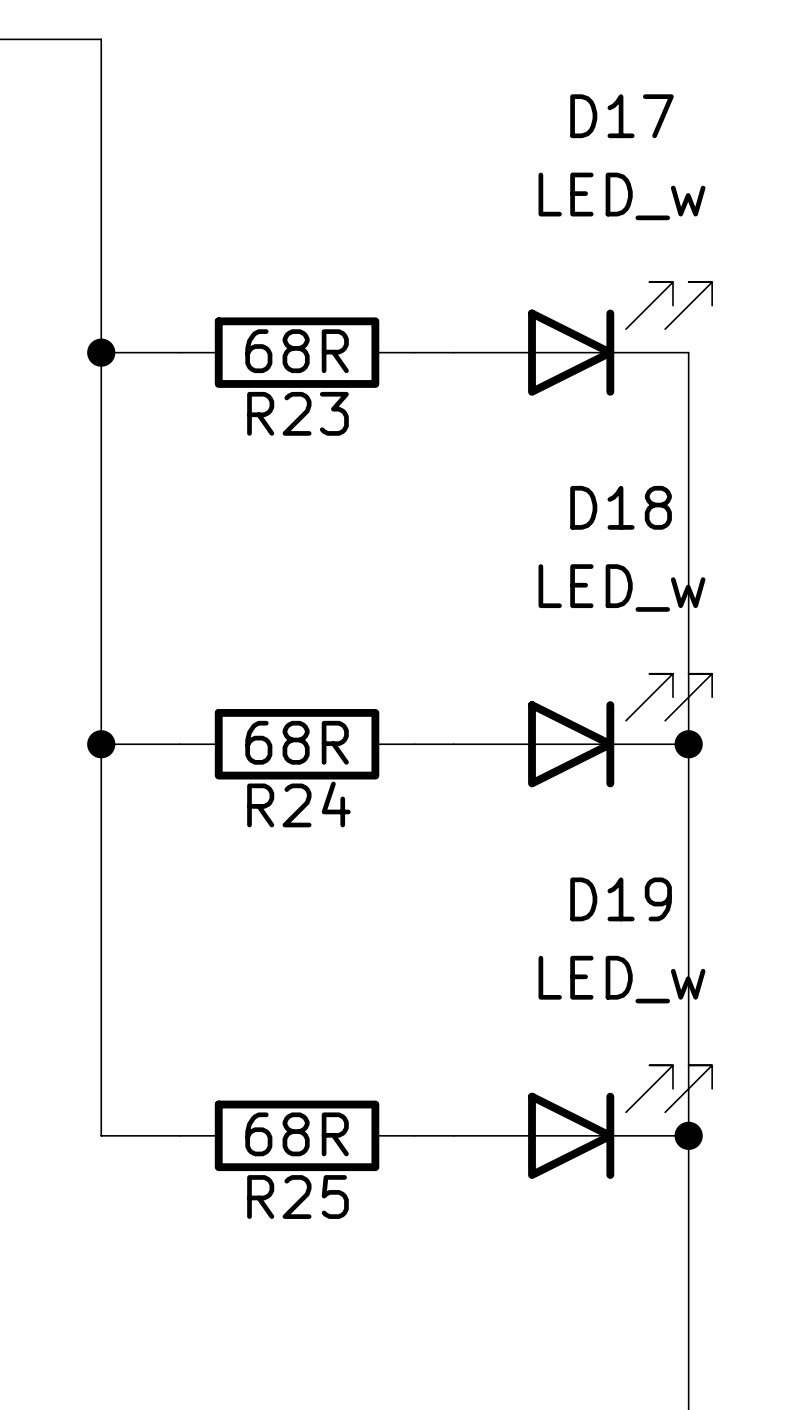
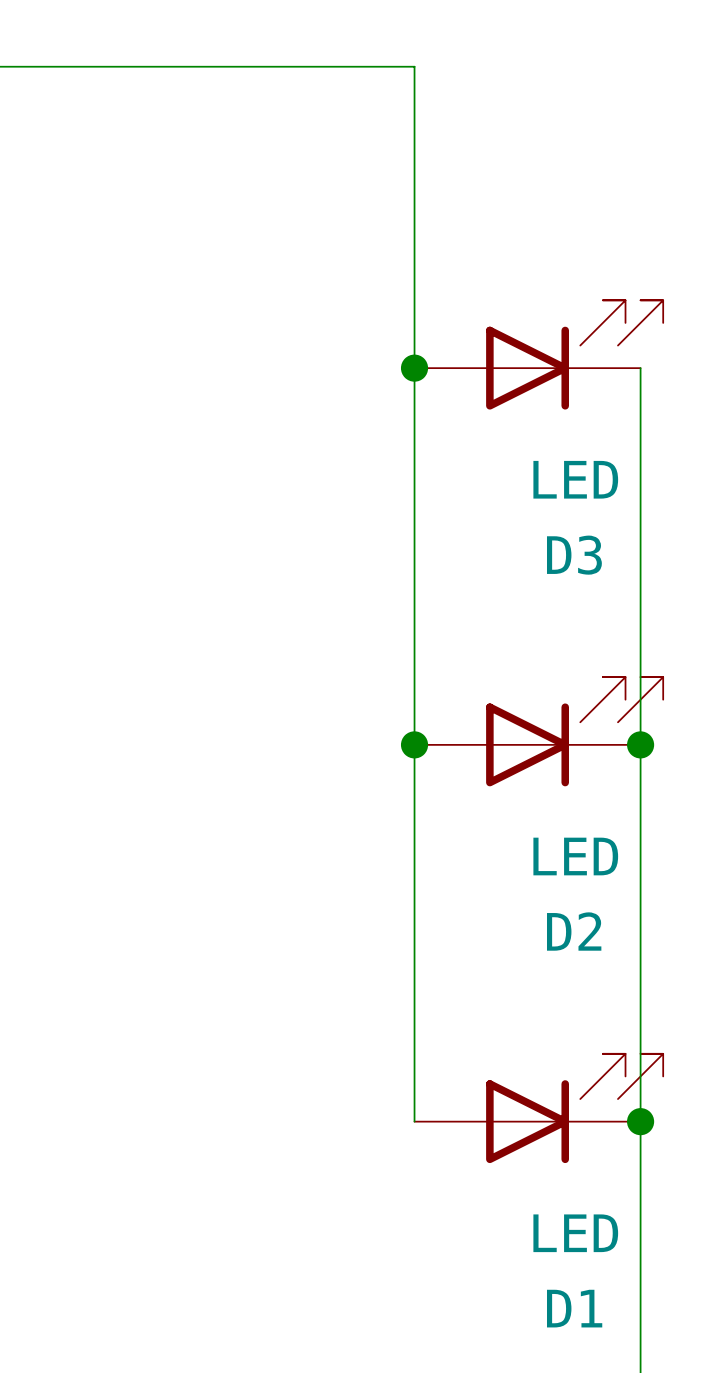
wire: (101, 39) (101, 1135) (179, 1135) -> (75, 66) (414, 66) (414, 1121)
D17 name: D17 (621, 116) -> D3 (574, 555)
D17 value: LED_w (621, 196) -> LED (575, 479)
wire: (101, 352) (179, 352) -> none
junction: (101, 352) -> none
R23: 68R (297, 352) -> none
wire: (414, 352) (453, 352) -> none
junction: none -> (414, 368)
D18 name: D18 (621, 507) -> D2 (574, 931)
D18 value: LED_w (621, 588) -> LED (575, 856)
wire: (101, 744) (179, 744) -> none
junction: (101, 744) -> none
R24: 68R (297, 744) -> none
wire: (414, 744) (453, 744) -> none
junction: none -> (414, 744)
D19 name: D19 (621, 899) -> D1 (574, 1308)
D19 value: LED_w (621, 979) -> LED (575, 1233)
R25: 68R (297, 1135) -> none
wire: (414, 1135) (453, 1135) -> none

